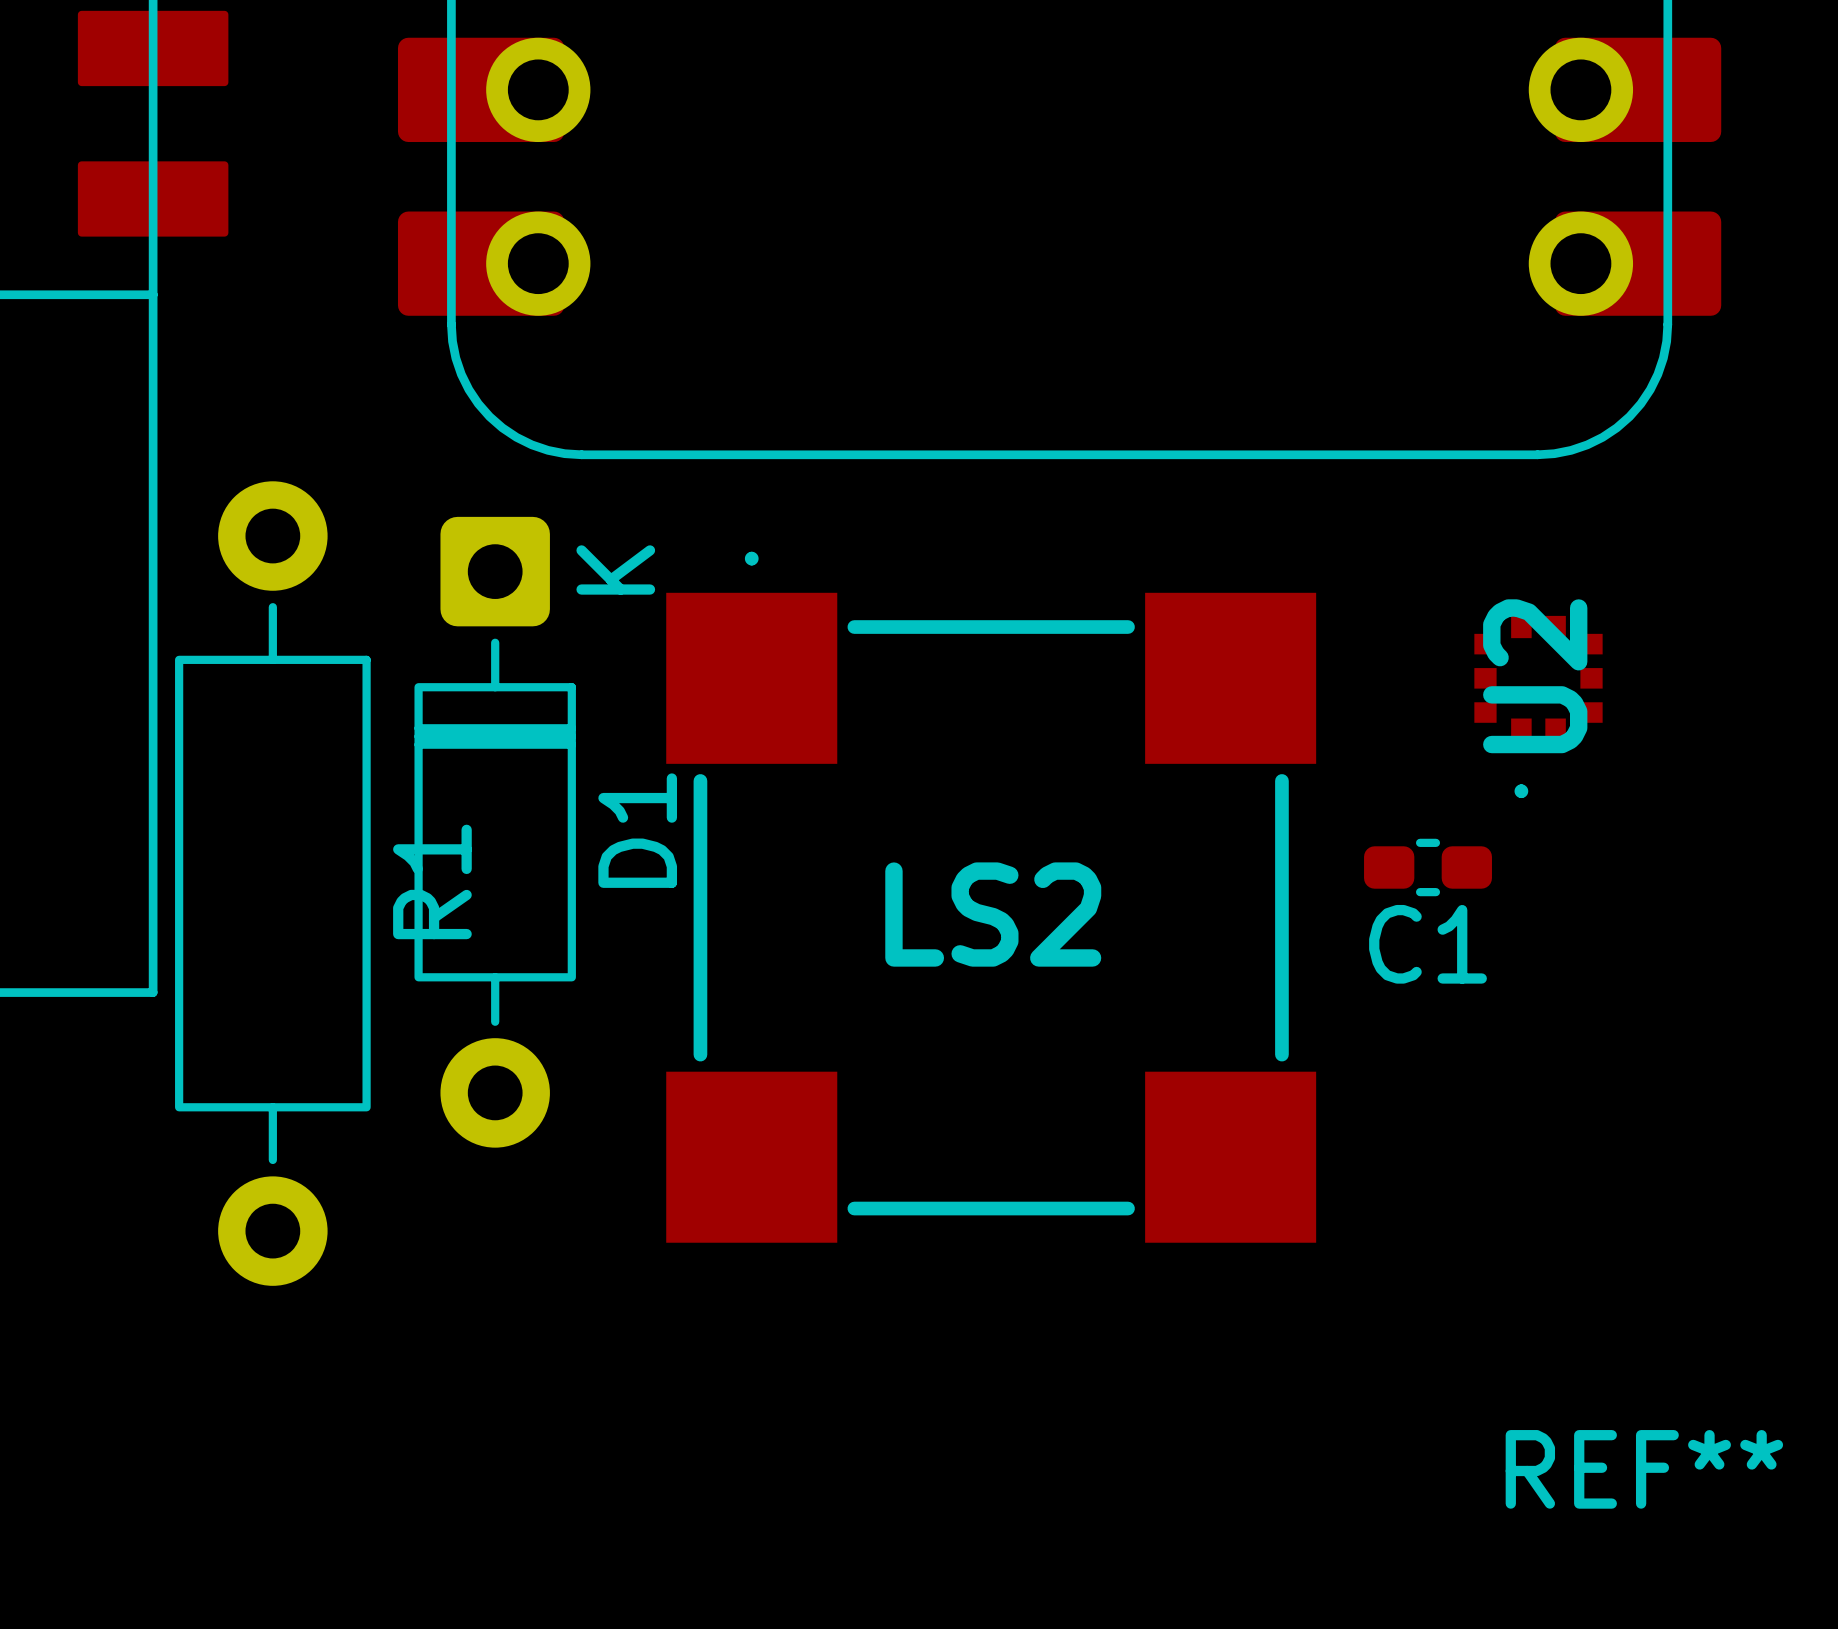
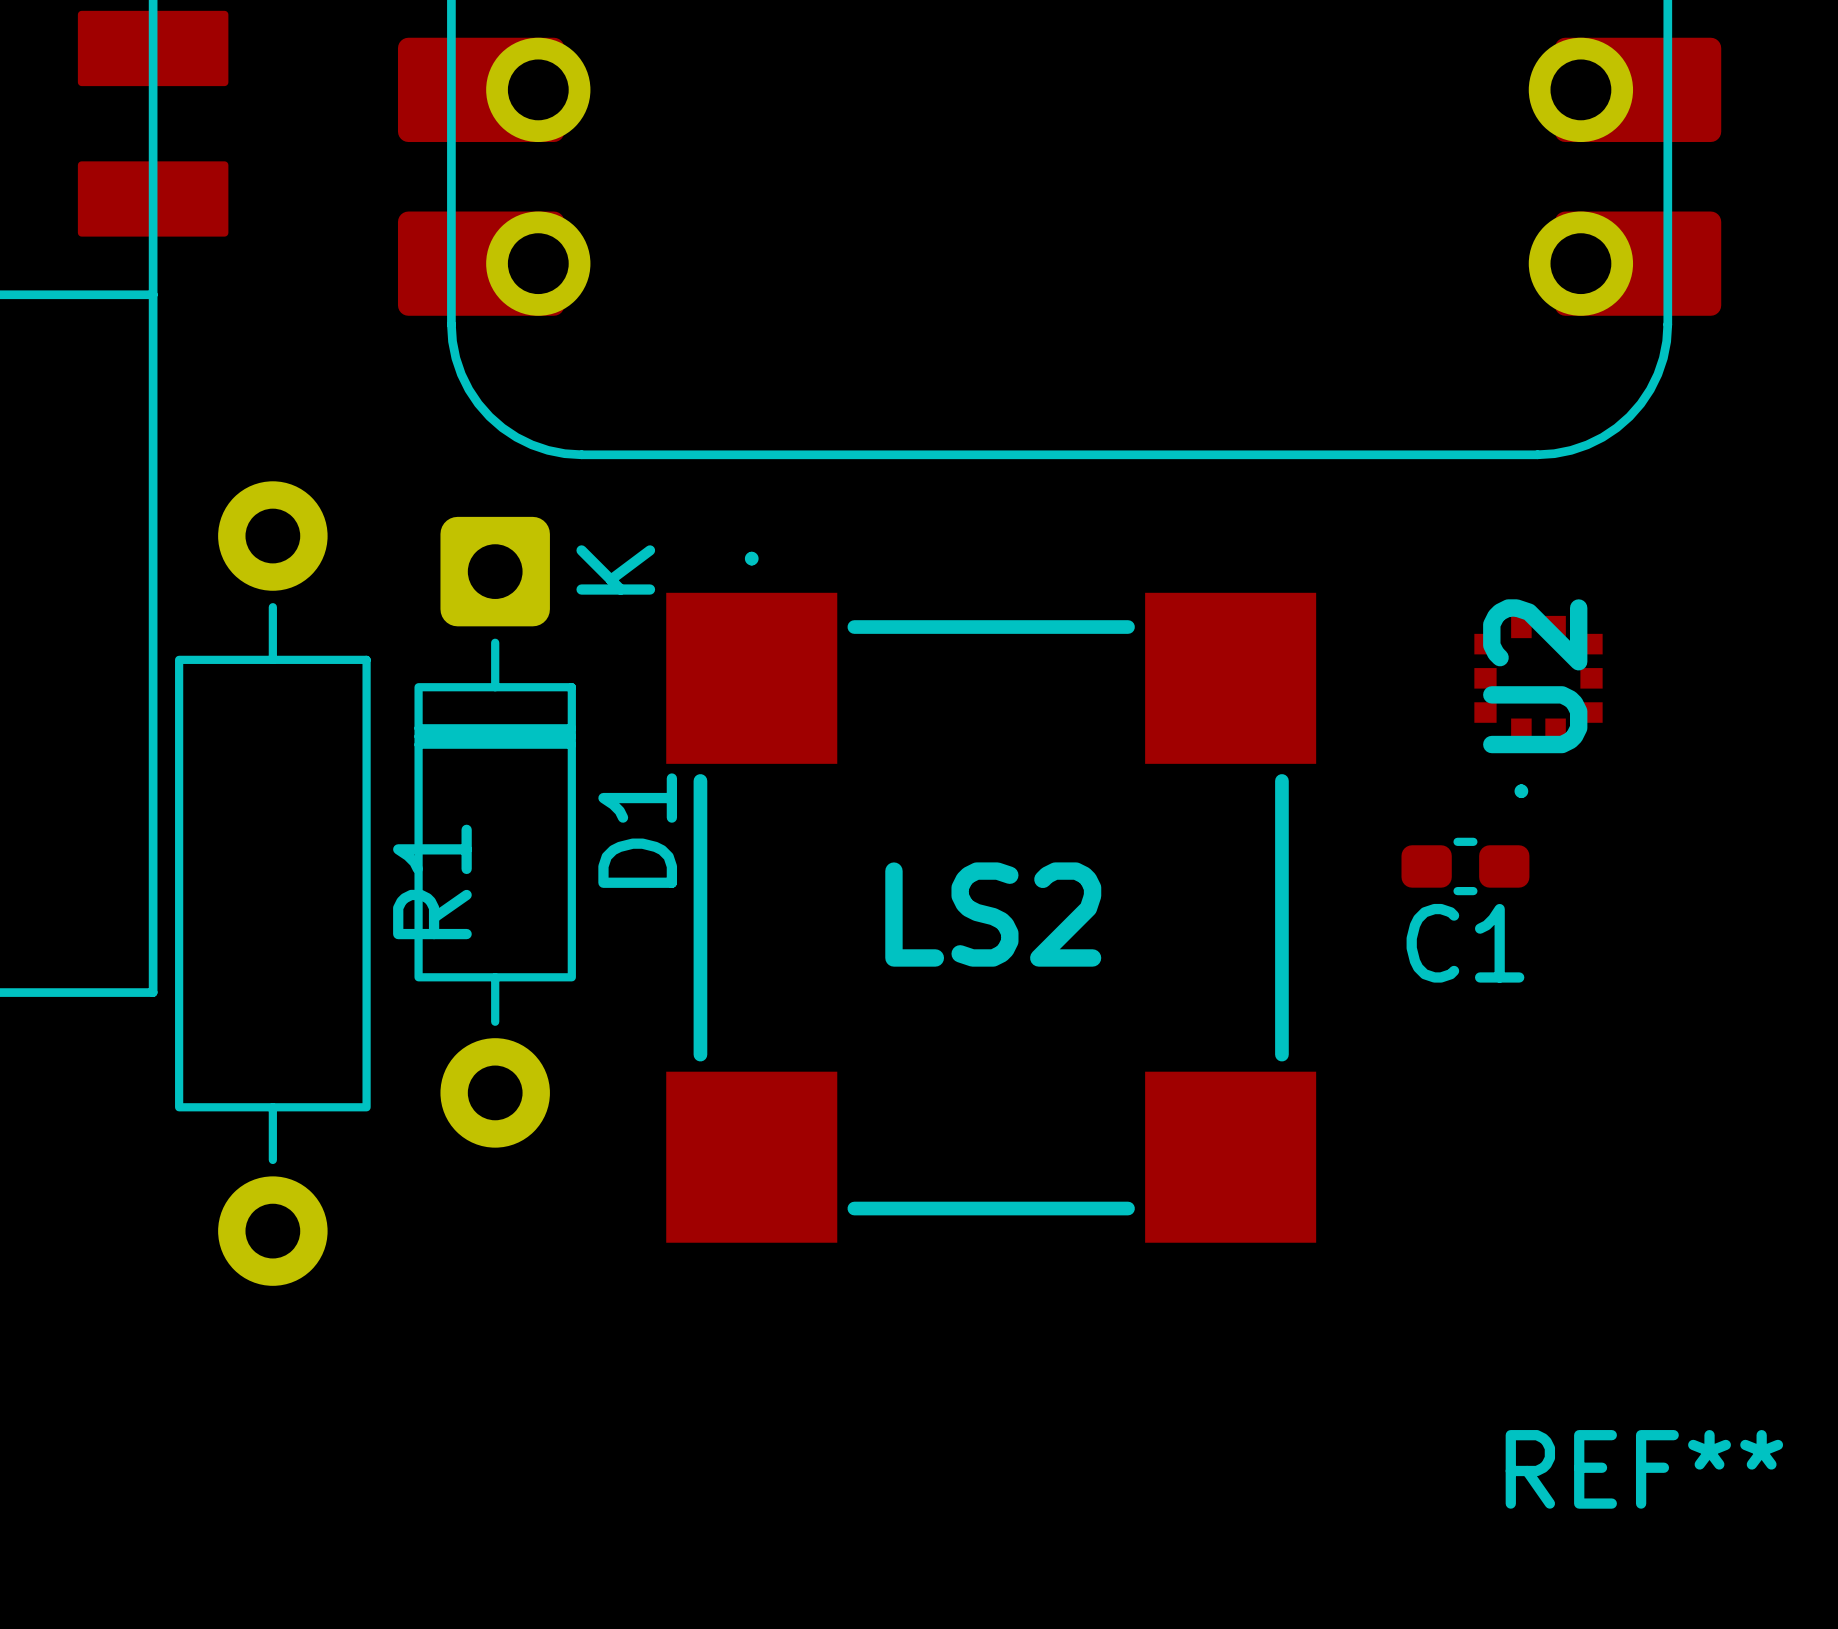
C1 position: (1428, 867) -> (1465, 866)

